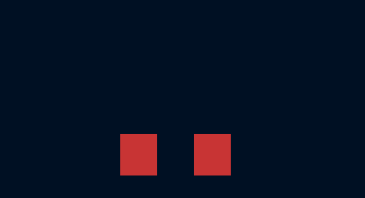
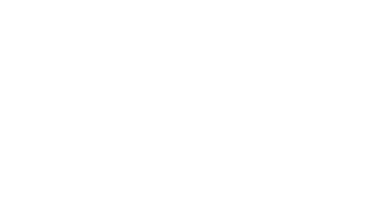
part: (175, 154) -> none

